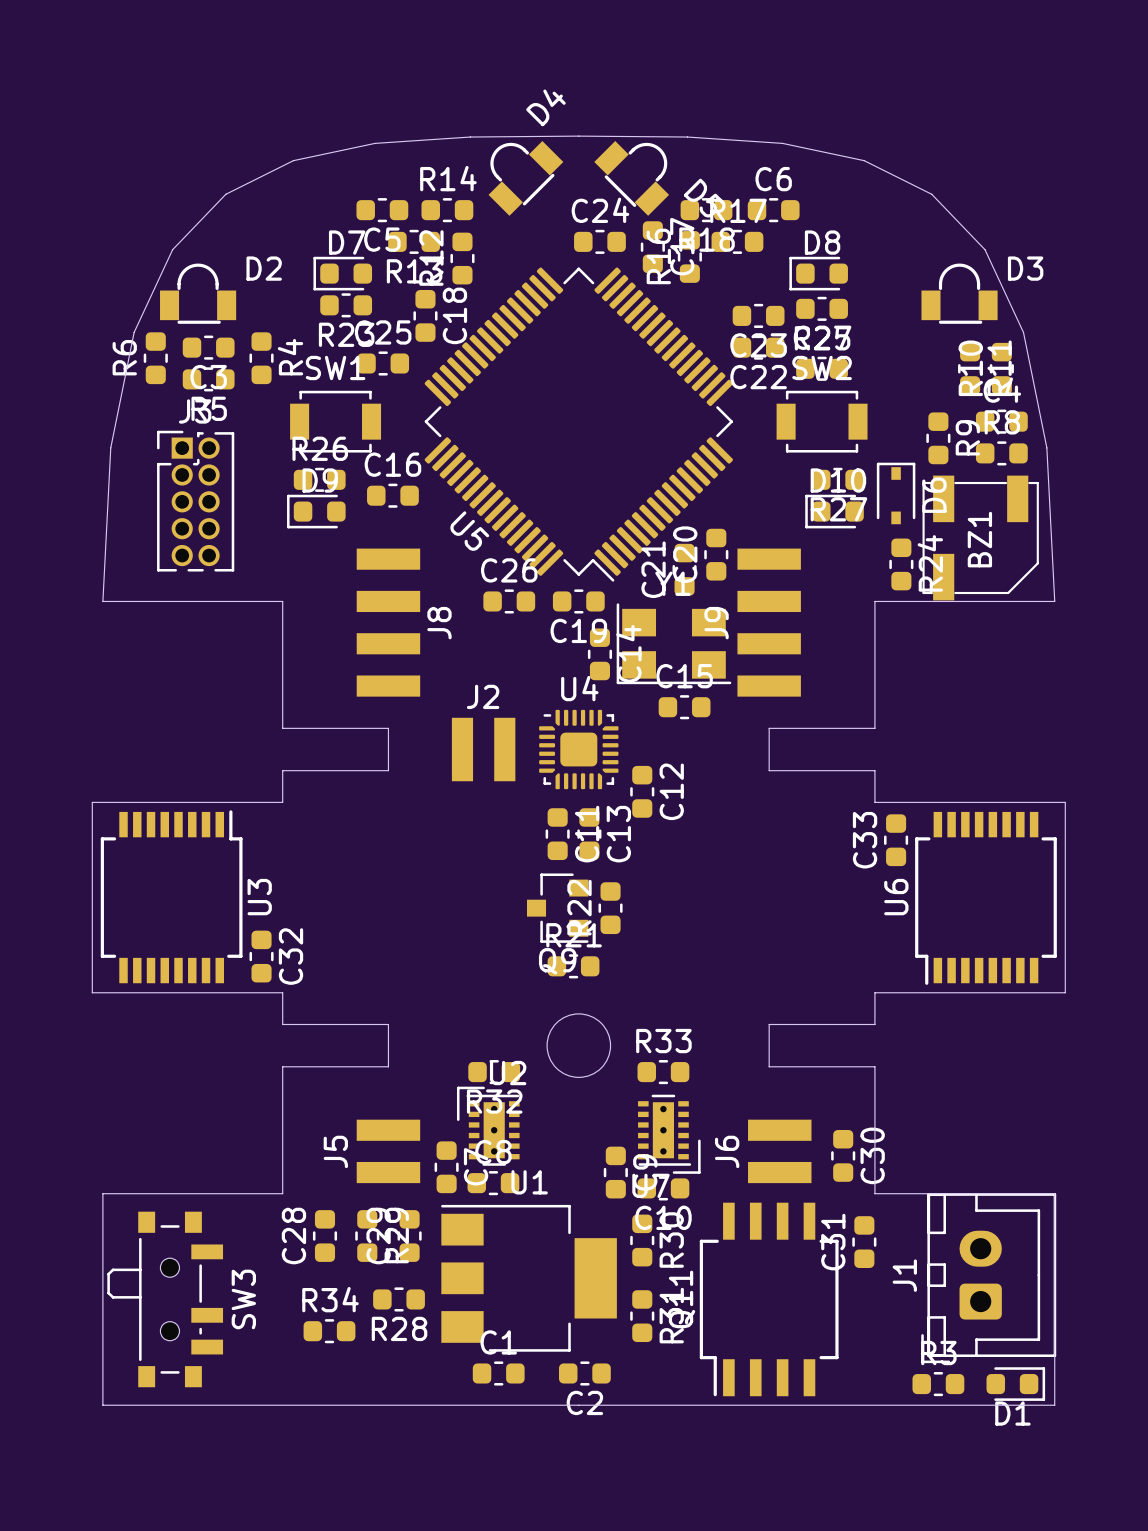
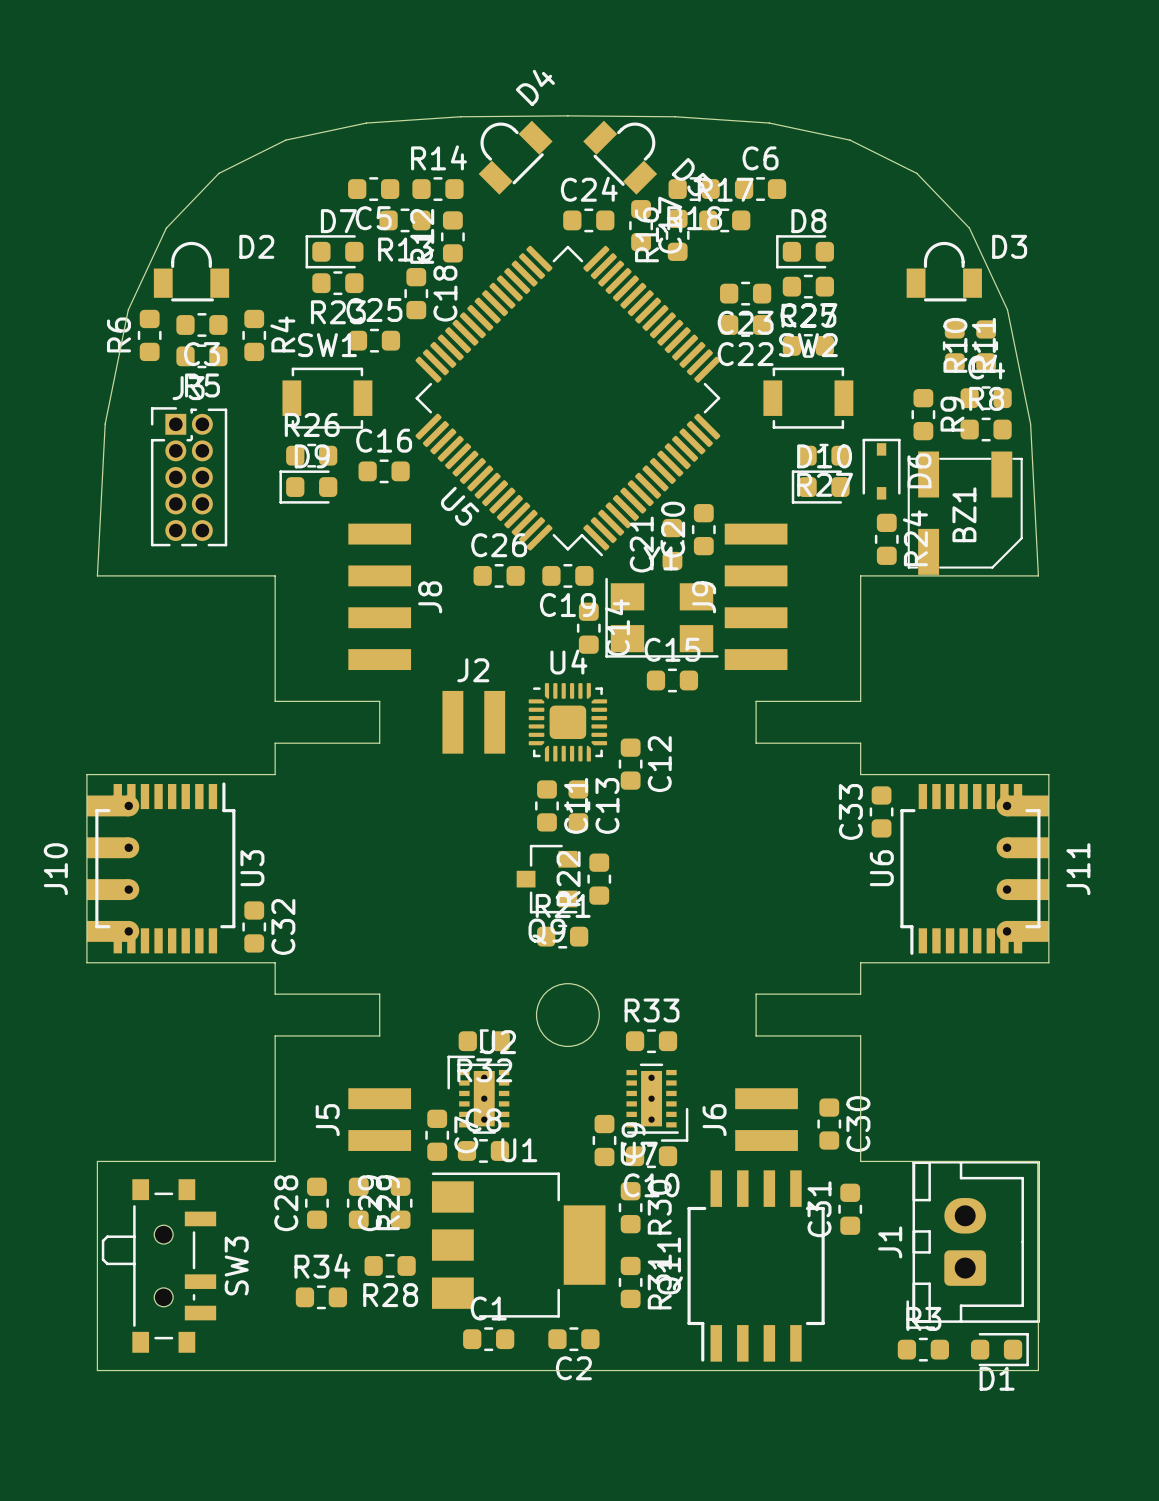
J10: none -> (113, 868)
J11: none -> (1022, 868)

